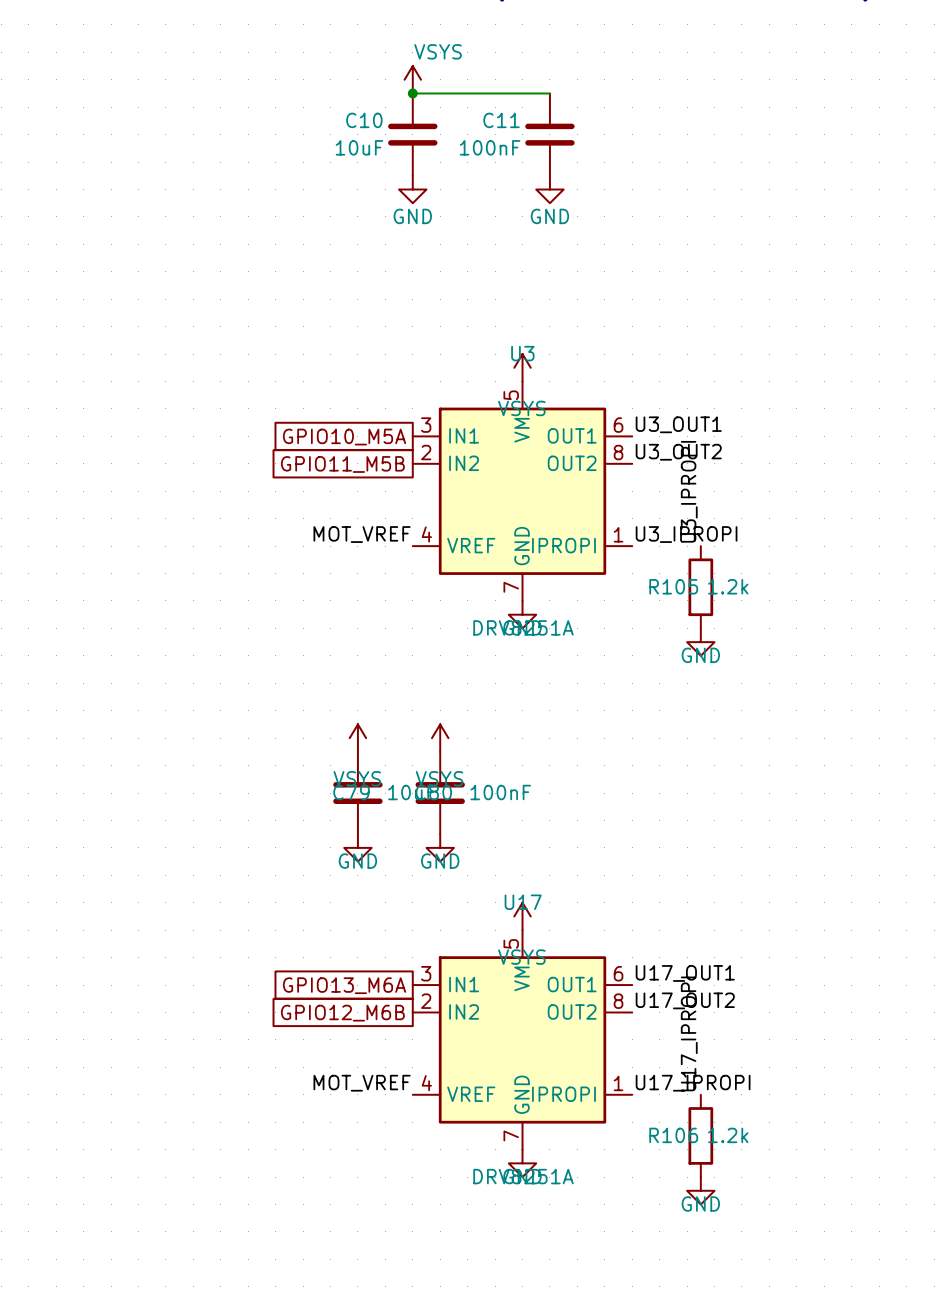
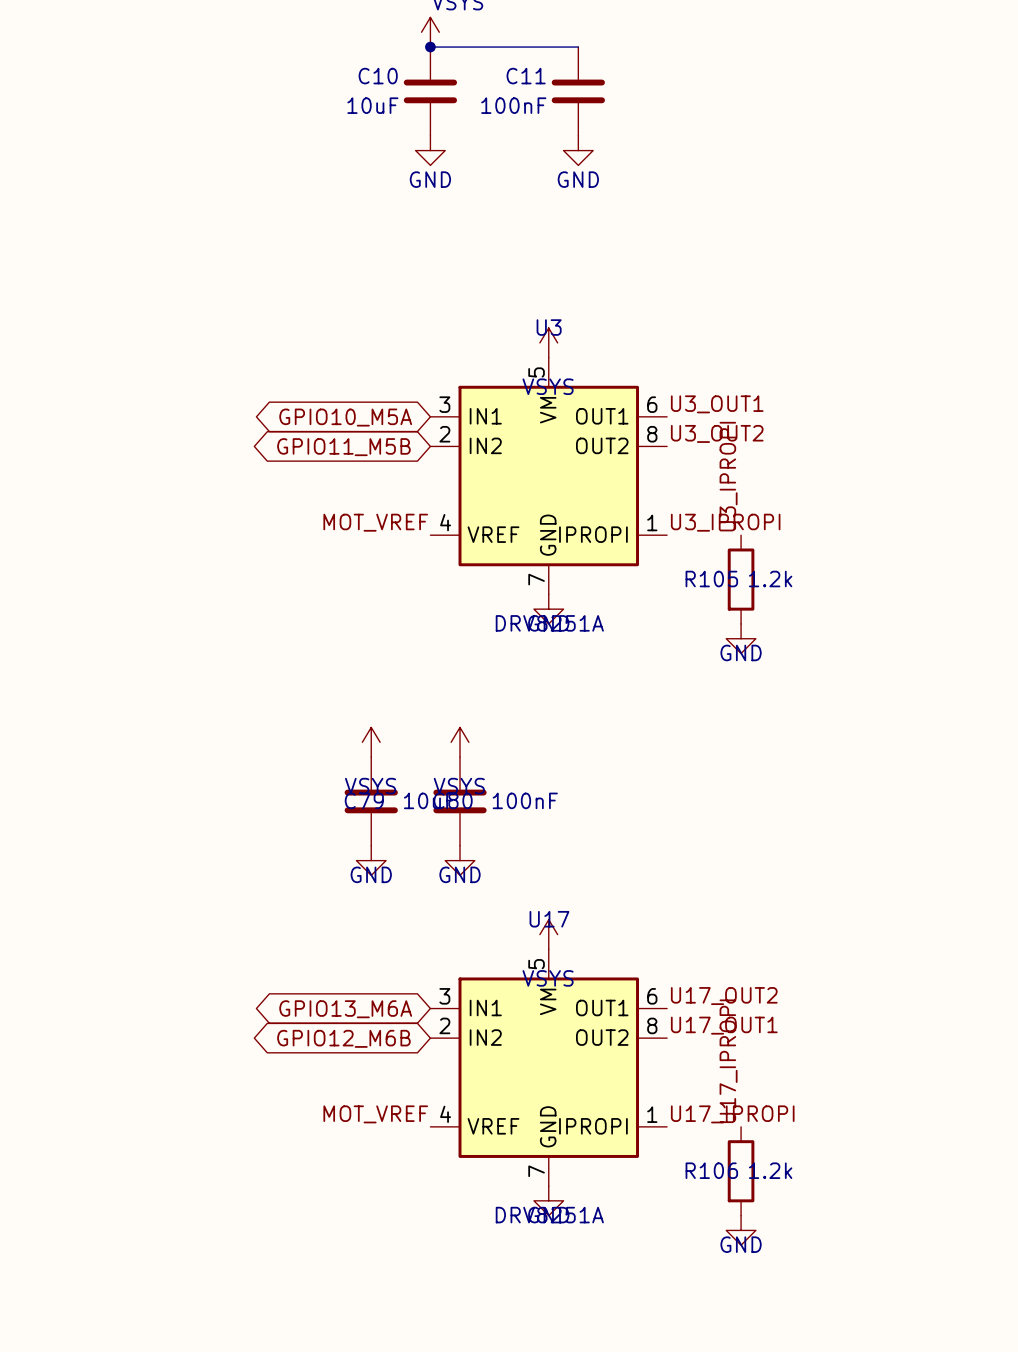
global label shape: passive (344, 437) -> bidirectional (345, 417)
global label shape: passive (342, 464) -> bidirectional (343, 447)
label: U17_OUT1 (685, 973) -> U17_OUT2 (724, 996)
global label shape: passive (344, 985) -> bidirectional (345, 1009)
label: U17_OUT2 (685, 1000) -> U17_OUT1 (724, 1025)
global label shape: passive (342, 1013) -> bidirectional (343, 1038)

